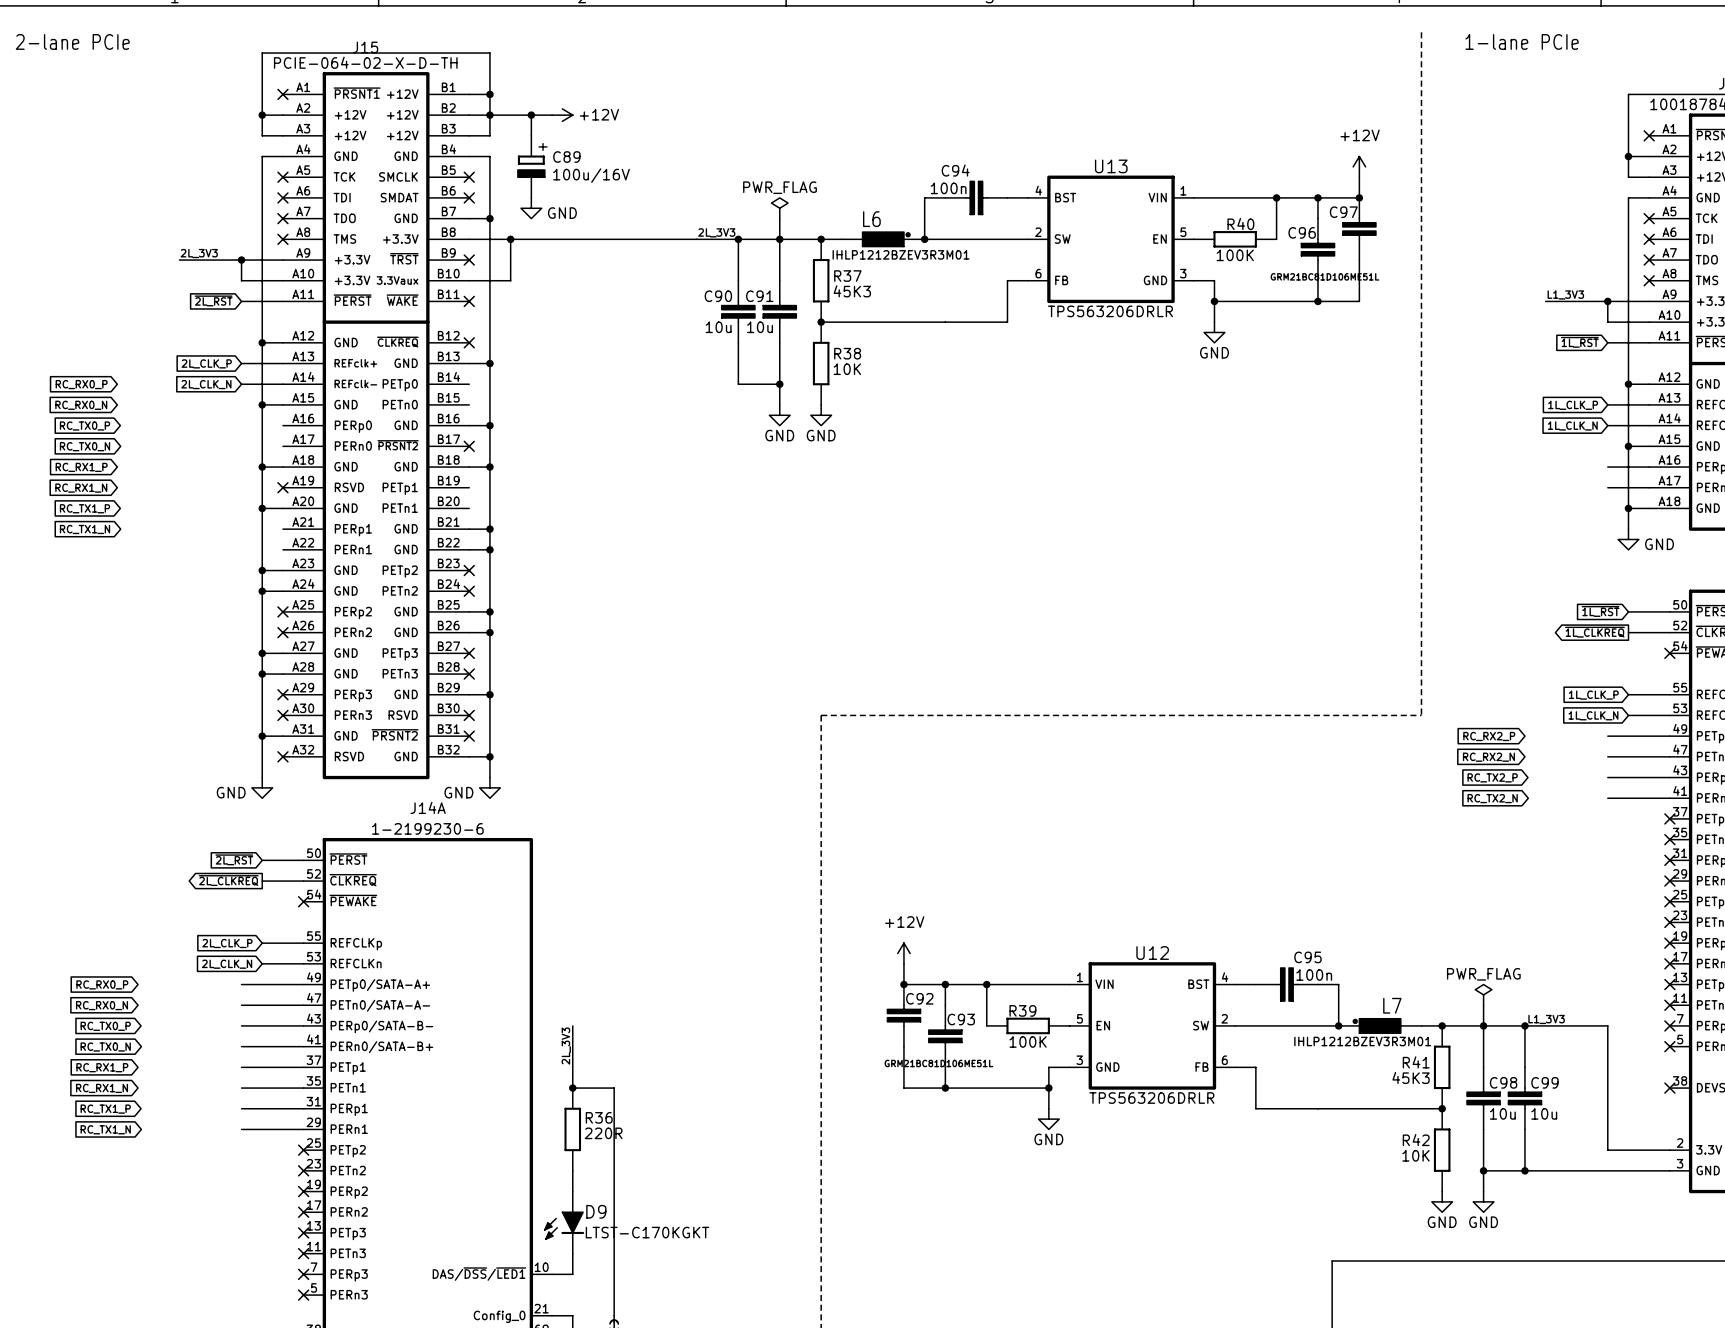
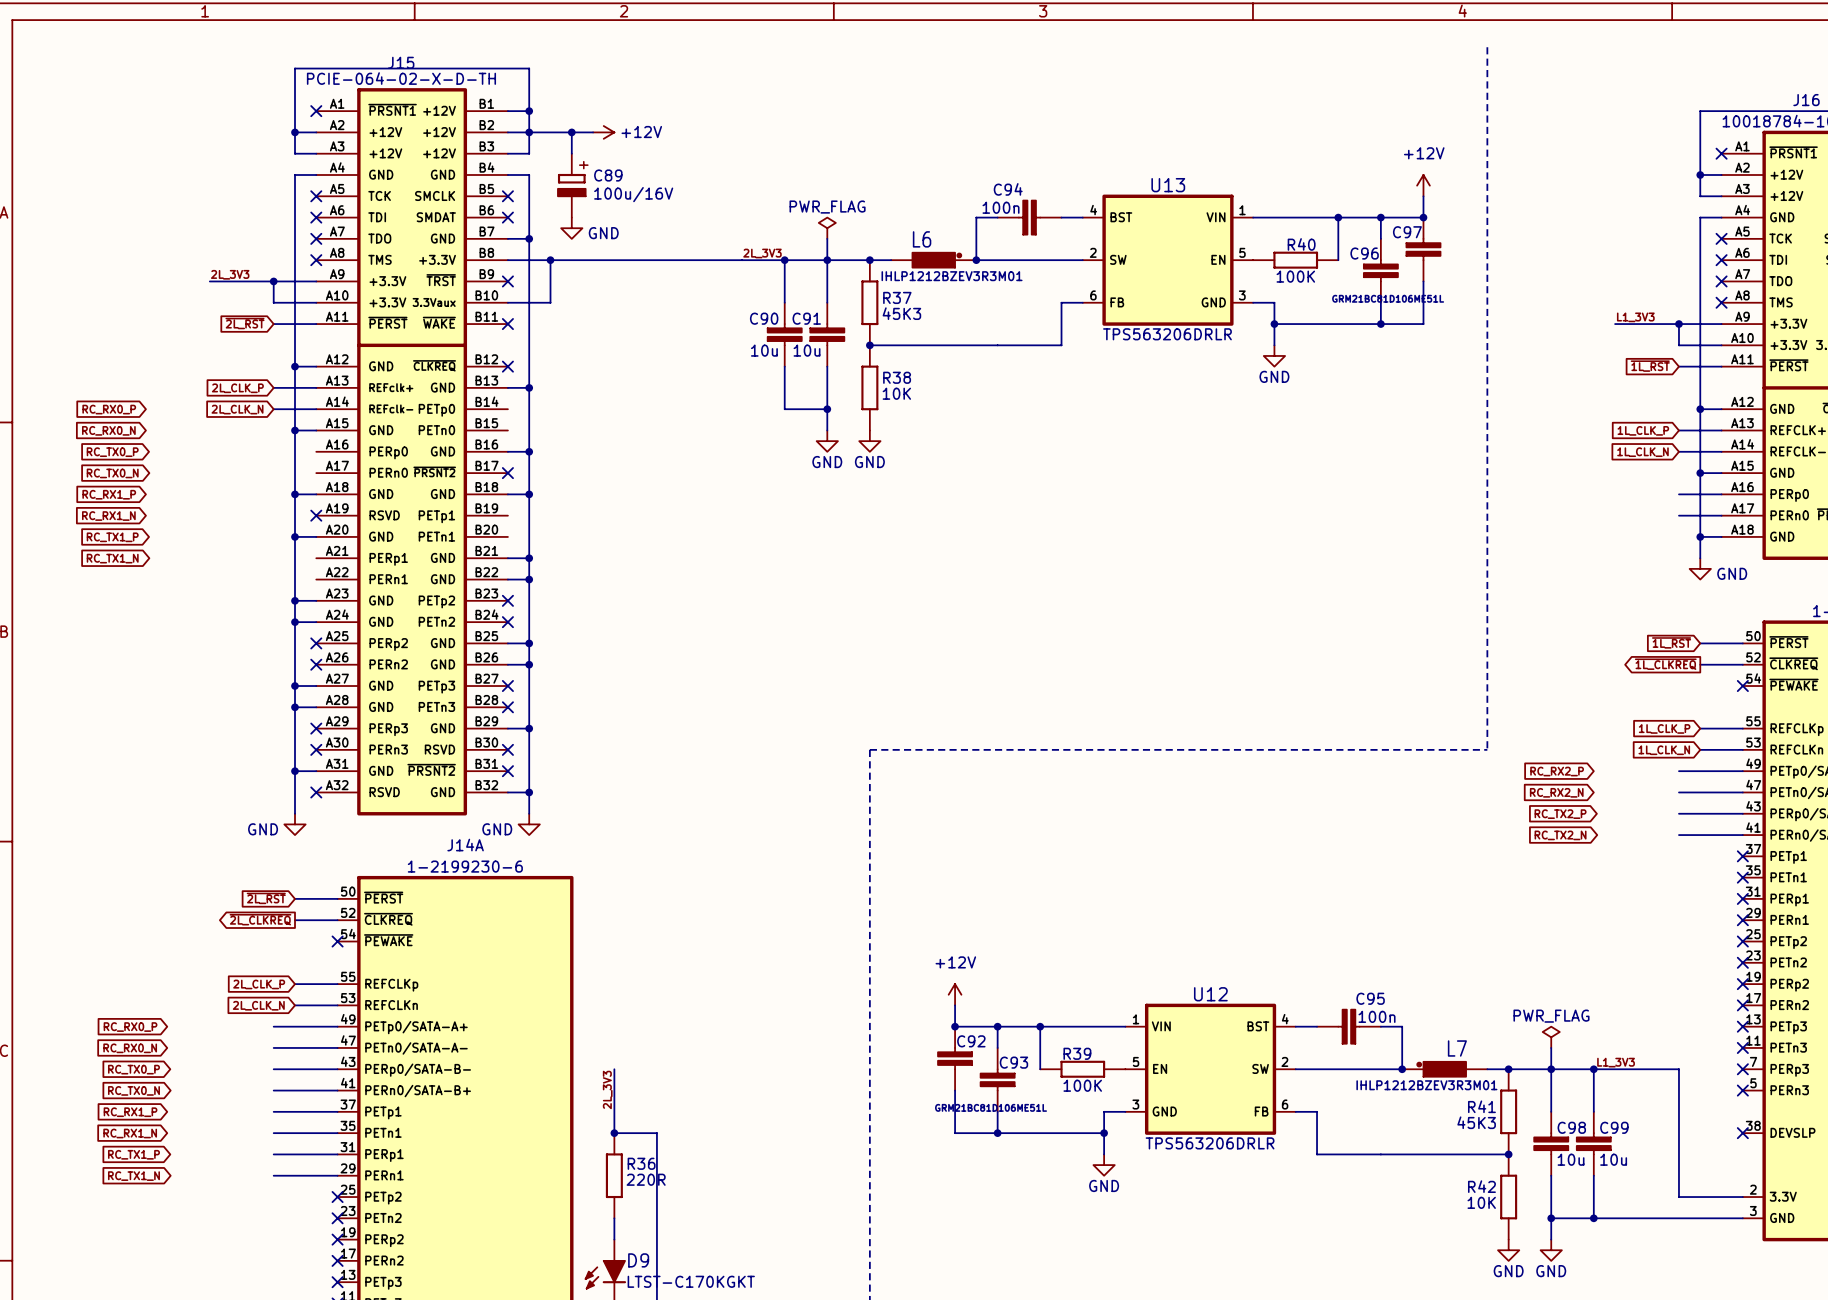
text: 2-lane PCIe (72, 41) -> none
text: 1-lane PCIe (1522, 41) -> none

